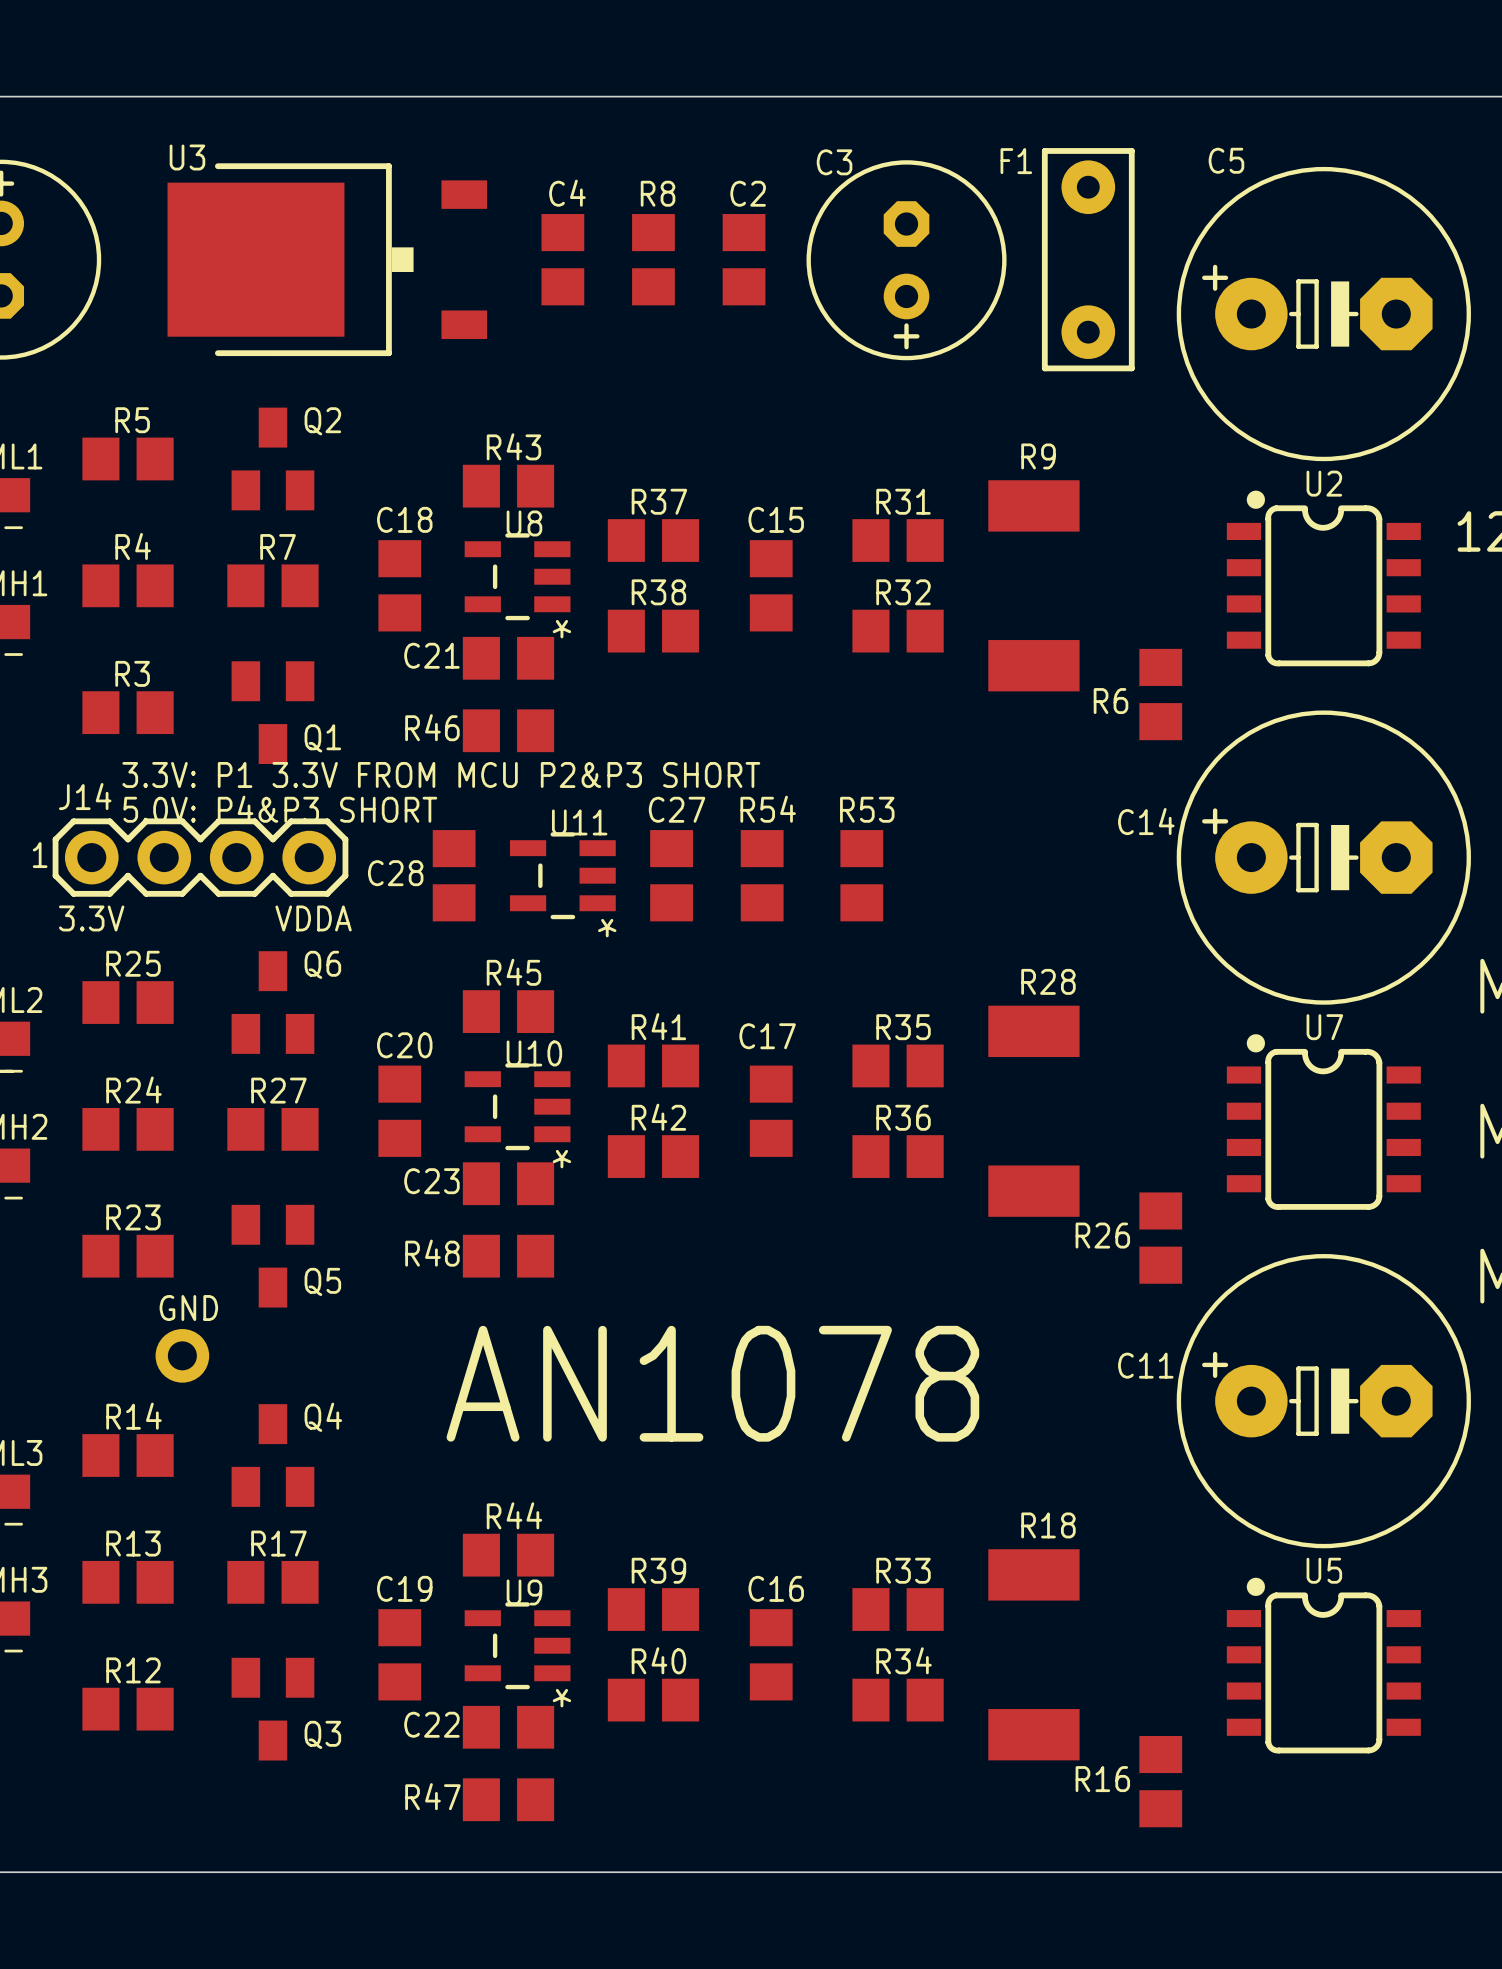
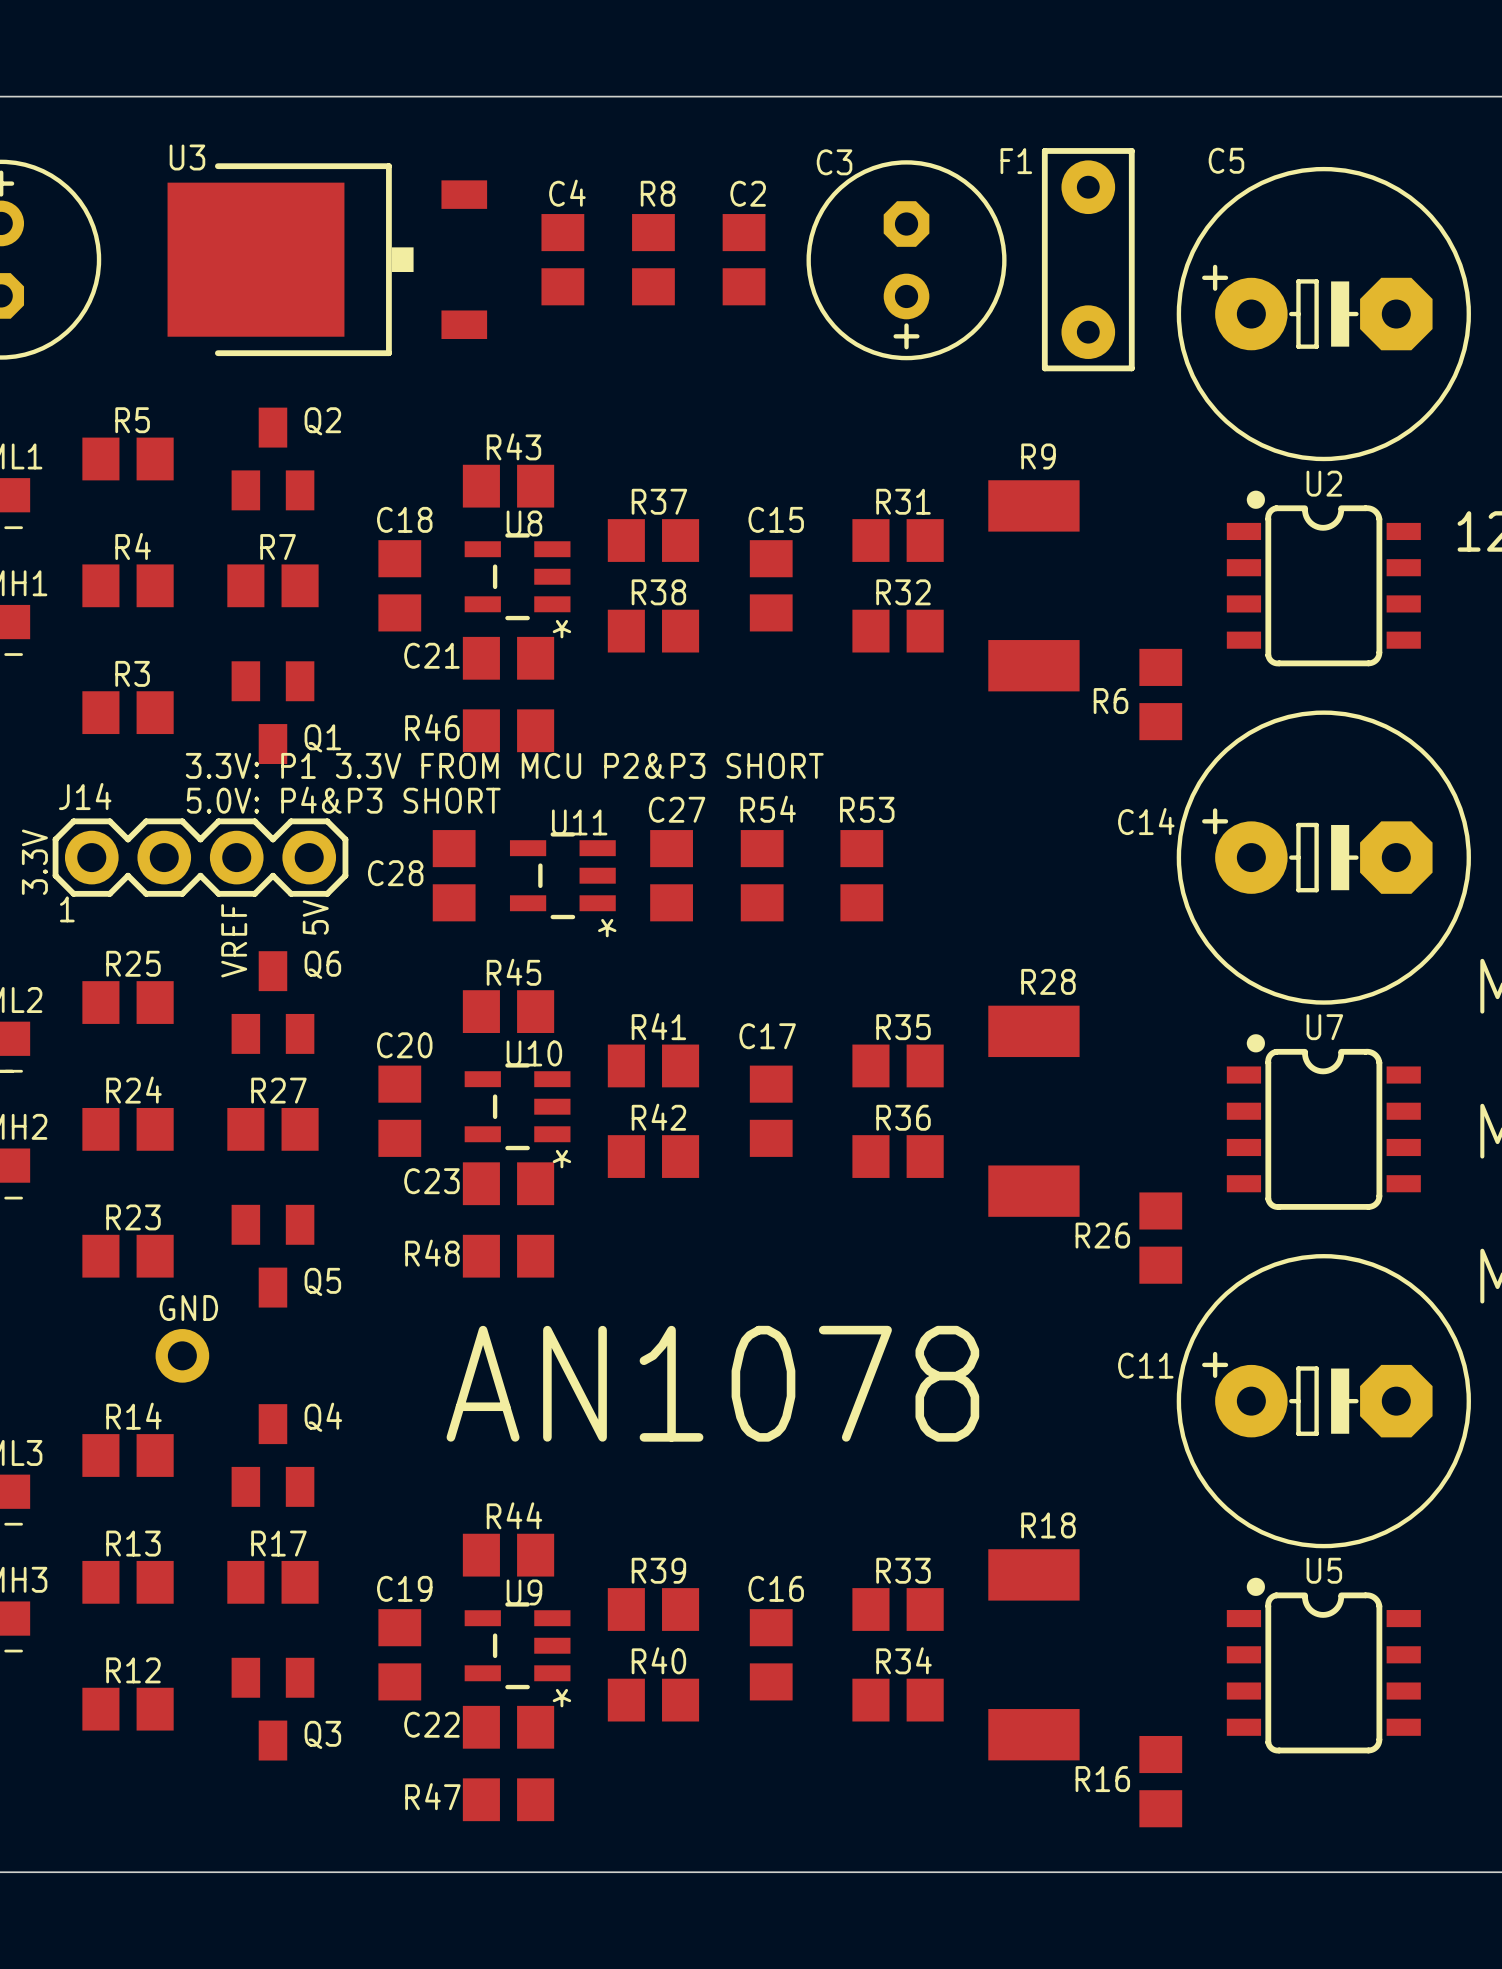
text position: 3.3V: P1 3.3V FROM MCU P2&P3 SHORT (441, 774) -> 3.3V: P1 3.3V FROM MCU P2&P3 SHORT (504, 765)
text position: 5.0V: P4&P3 SHORT (280, 809) -> 5.0V: P4&P3 SHORT (343, 800)
text position: 1 (40, 855) -> 1 (67, 909)
text: none -> 5V (315, 917)
text rotation: 0° (91, 918) -> 90° counterclockwise (34, 862)
text position: 3.3V (91, 918) -> 3.3V (34, 862)
text: VDDA (313, 918) -> none
text: none -> VREF (234, 940)

